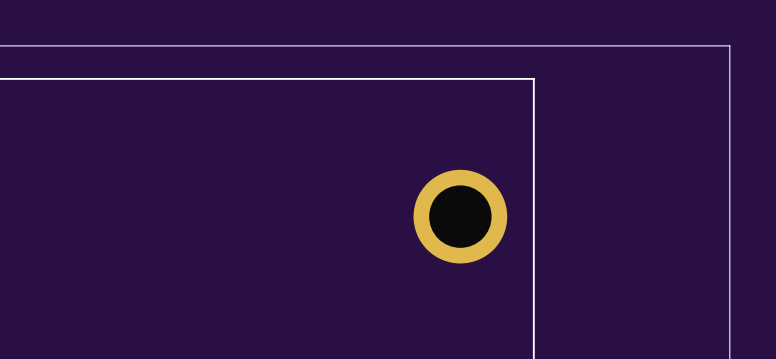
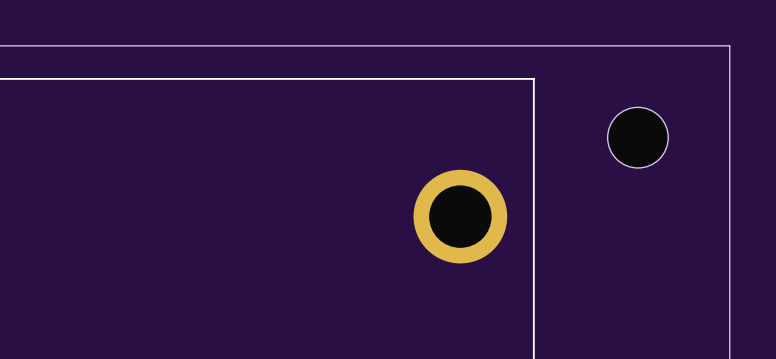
hole: none -> (637, 137)

